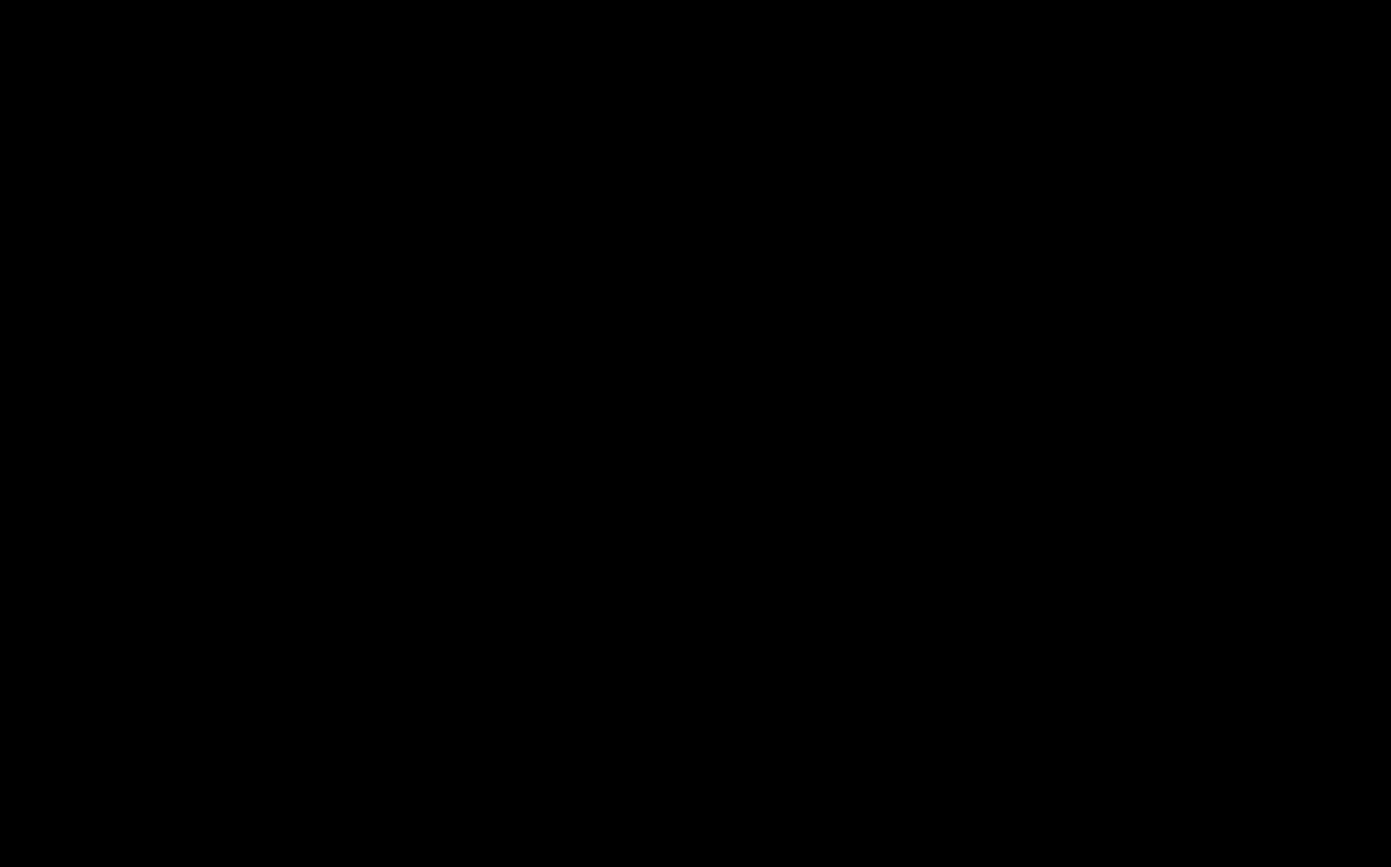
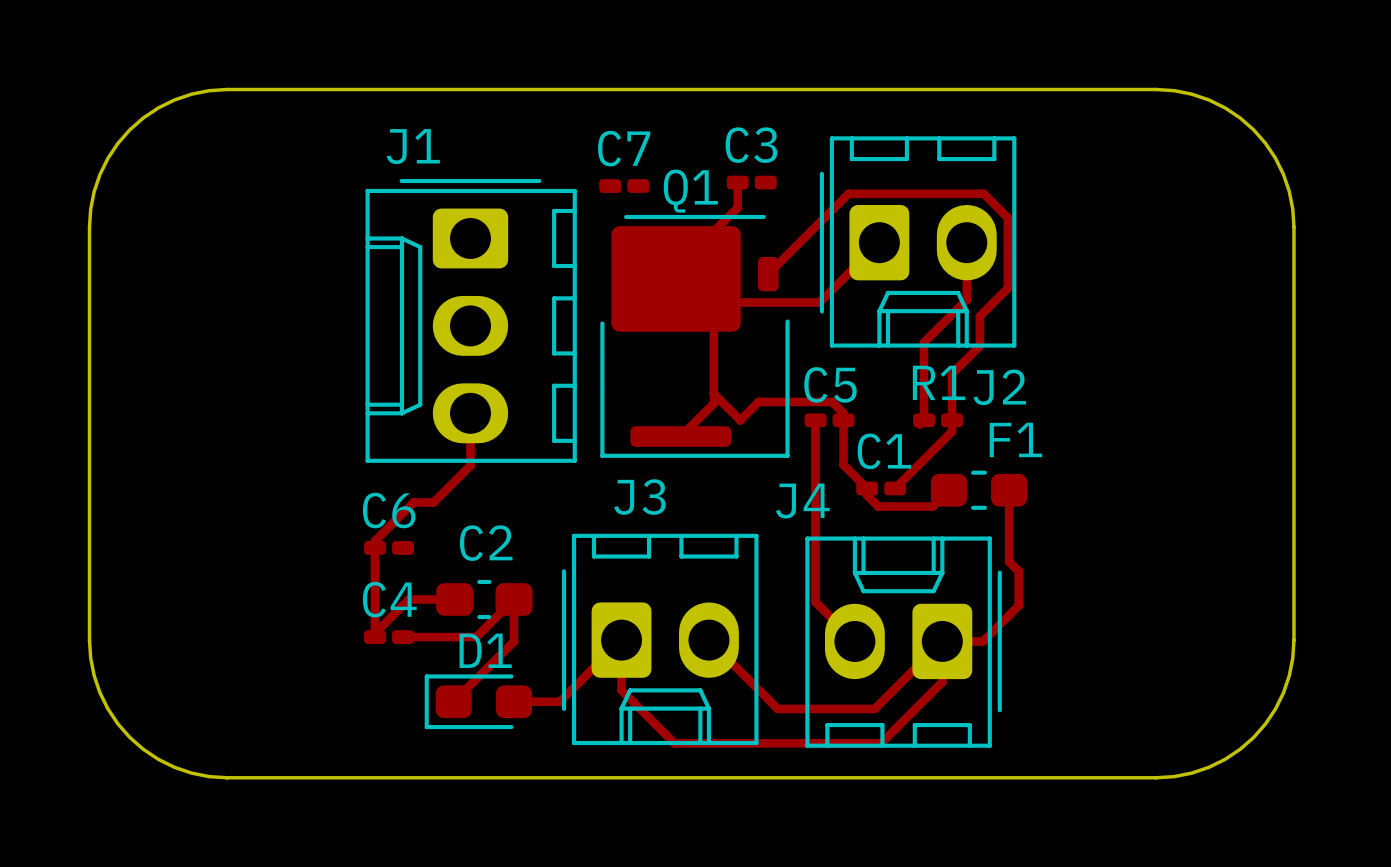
board edge: none -> (227, 89) (1156, 89) (1191, 94) (1225, 107) (1253, 129) (1265, 143) (1283, 174) (1292, 209) (1293, 640) (1289, 675) (1275, 708) (1253, 737) (1225, 759) (1191, 773) (1156, 777) (227, 777) (191, 773) (158, 759) (143, 749) (117, 723) (99, 692) (90, 658) (90, 209) (99, 174) (107, 158) (129, 129) (143, 117) (158, 107) (191, 94) (227, 89)
track: none -> (737, 182) (737, 207) (709, 236) (713, 241) (713, 393) (740, 420) (758, 401) (832, 401) (843, 413) (843, 464) (867, 488) (867, 495) (878, 506) (932, 506) (948, 490)
C3: none -> (751, 182)
C7: none -> (624, 186)
J2: none -> (918, 241)
track: none -> (879, 242) (819, 302) (699, 302) (676, 278)
track: none -> (966, 242) (966, 299) (923, 342) (923, 420) (919, 424)
track: none -> (768, 274) (848, 193) (983, 193) (1007, 217) (1007, 288) (979, 316) (979, 346) (952, 373) (952, 431) (895, 488)
J1: none -> (471, 320)
Q1: none -> (694, 336)
track: none -> (714, 394) (714, 403) (680, 436)
track: none -> (470, 413) (470, 465) (433, 502) (413, 502) (375, 541) (375, 547)
track: none -> (815, 420) (815, 602) (854, 641)
C5: none -> (829, 420)
R1: none -> (937, 420)
C1: none -> (881, 488)
F1: none -> (979, 490)
track: none -> (1009, 490) (1009, 561) (1018, 571) (1018, 605) (982, 641) (942, 641)
C6: none -> (389, 547)
track: none -> (374, 548) (374, 637)
track: none -> (454, 599) (408, 599) (374, 633)
C2: none -> (484, 599)
C4: none -> (388, 637)
track: none -> (402, 637) (476, 637) (514, 599) (514, 641) (453, 701)
J3: none -> (660, 639)
track: none -> (708, 640) (777, 708) (874, 708) (942, 641)
track: none -> (942, 641) (942, 682) (881, 743) (674, 743) (621, 690) (621, 640) (559, 701) (514, 701)
J4: none -> (903, 642)
D1: none -> (478, 701)

